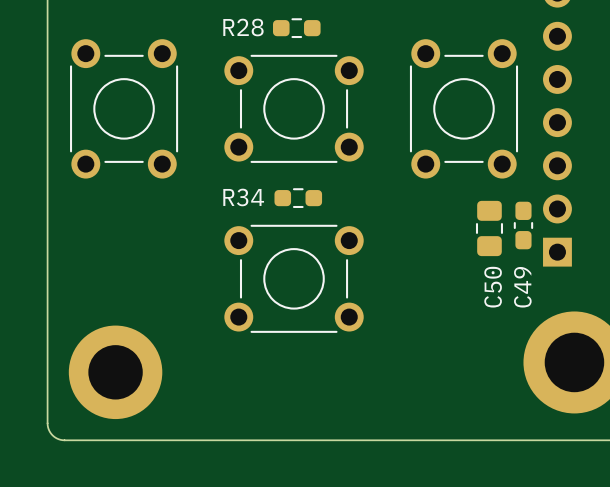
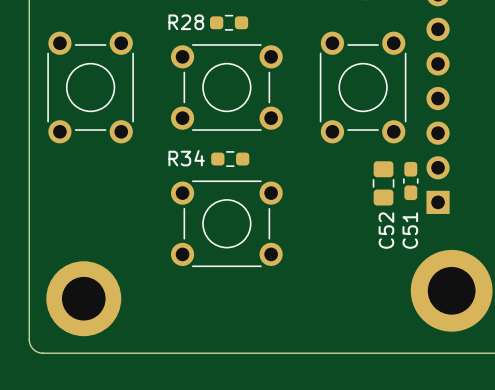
C50 name: C50 (493, 287) -> C52 (386, 230)
C49 name: C49 (522, 287) -> C51 (410, 230)

